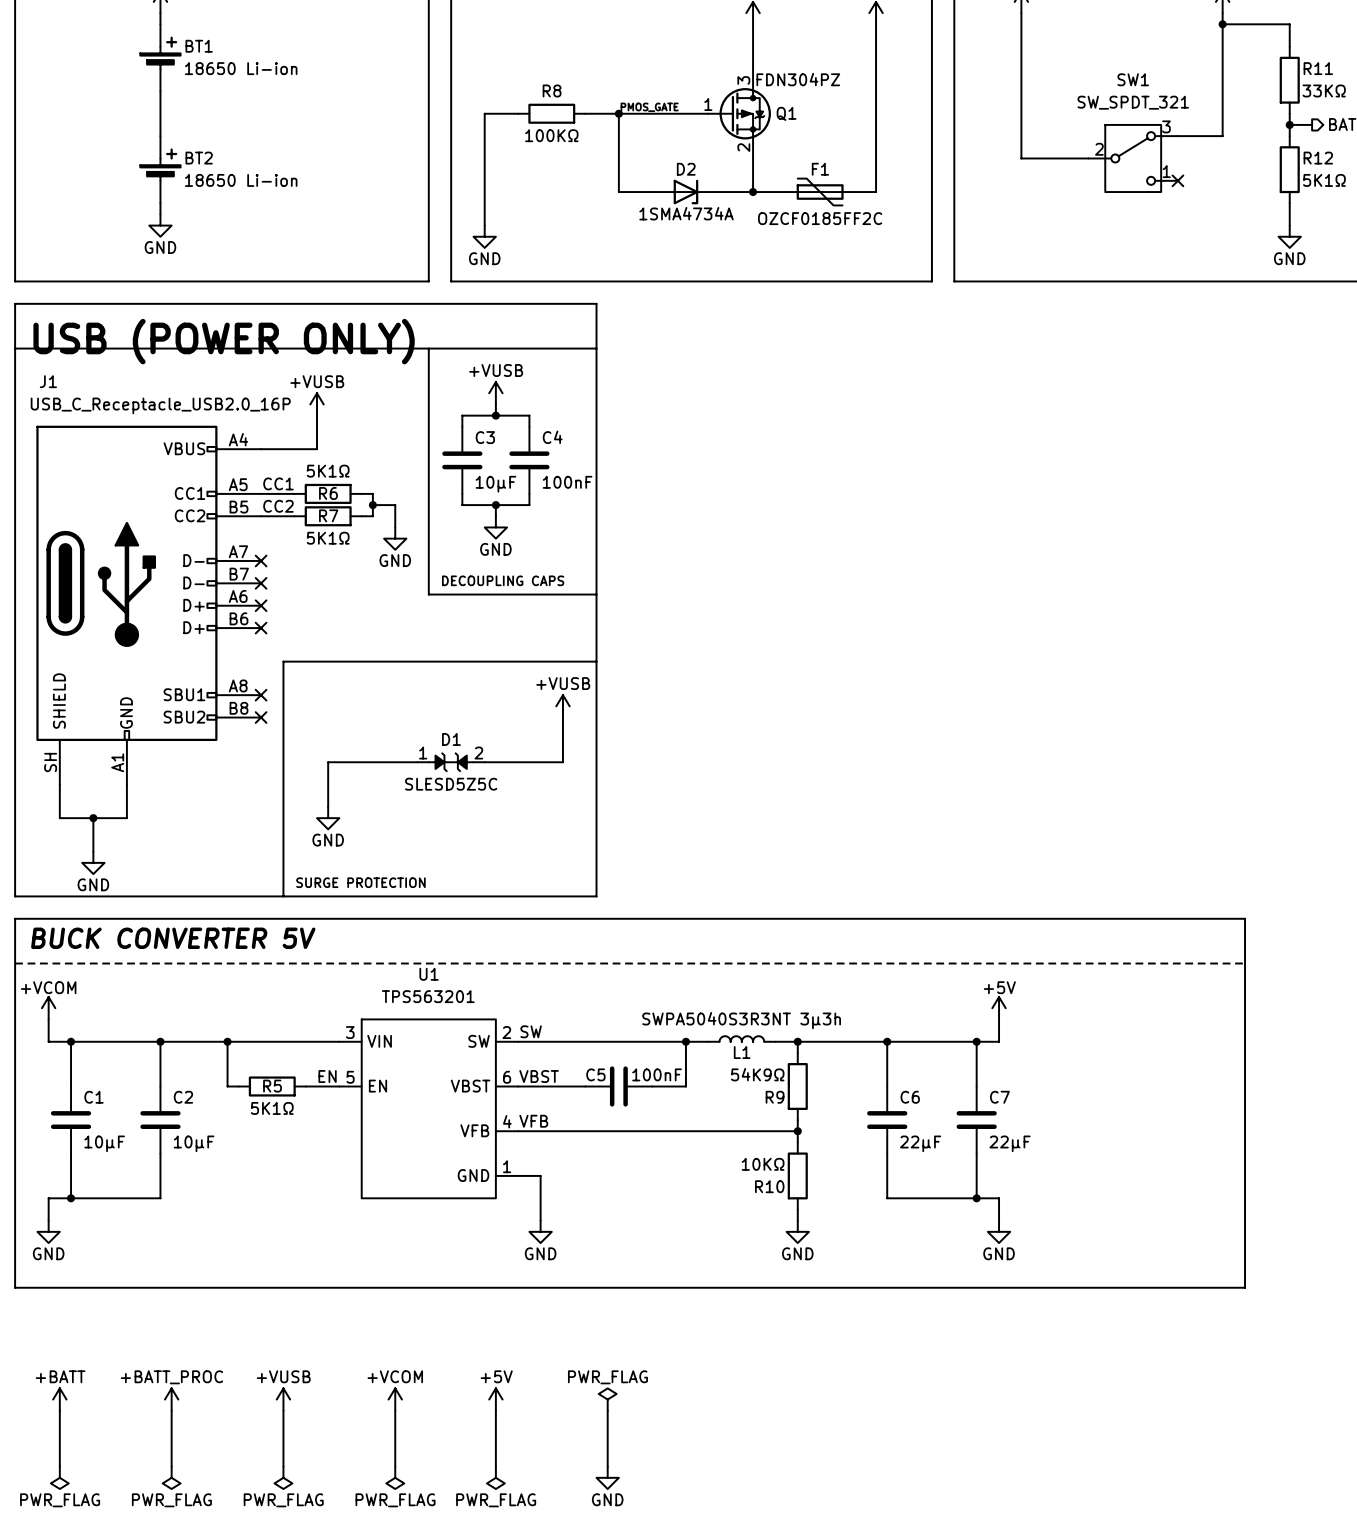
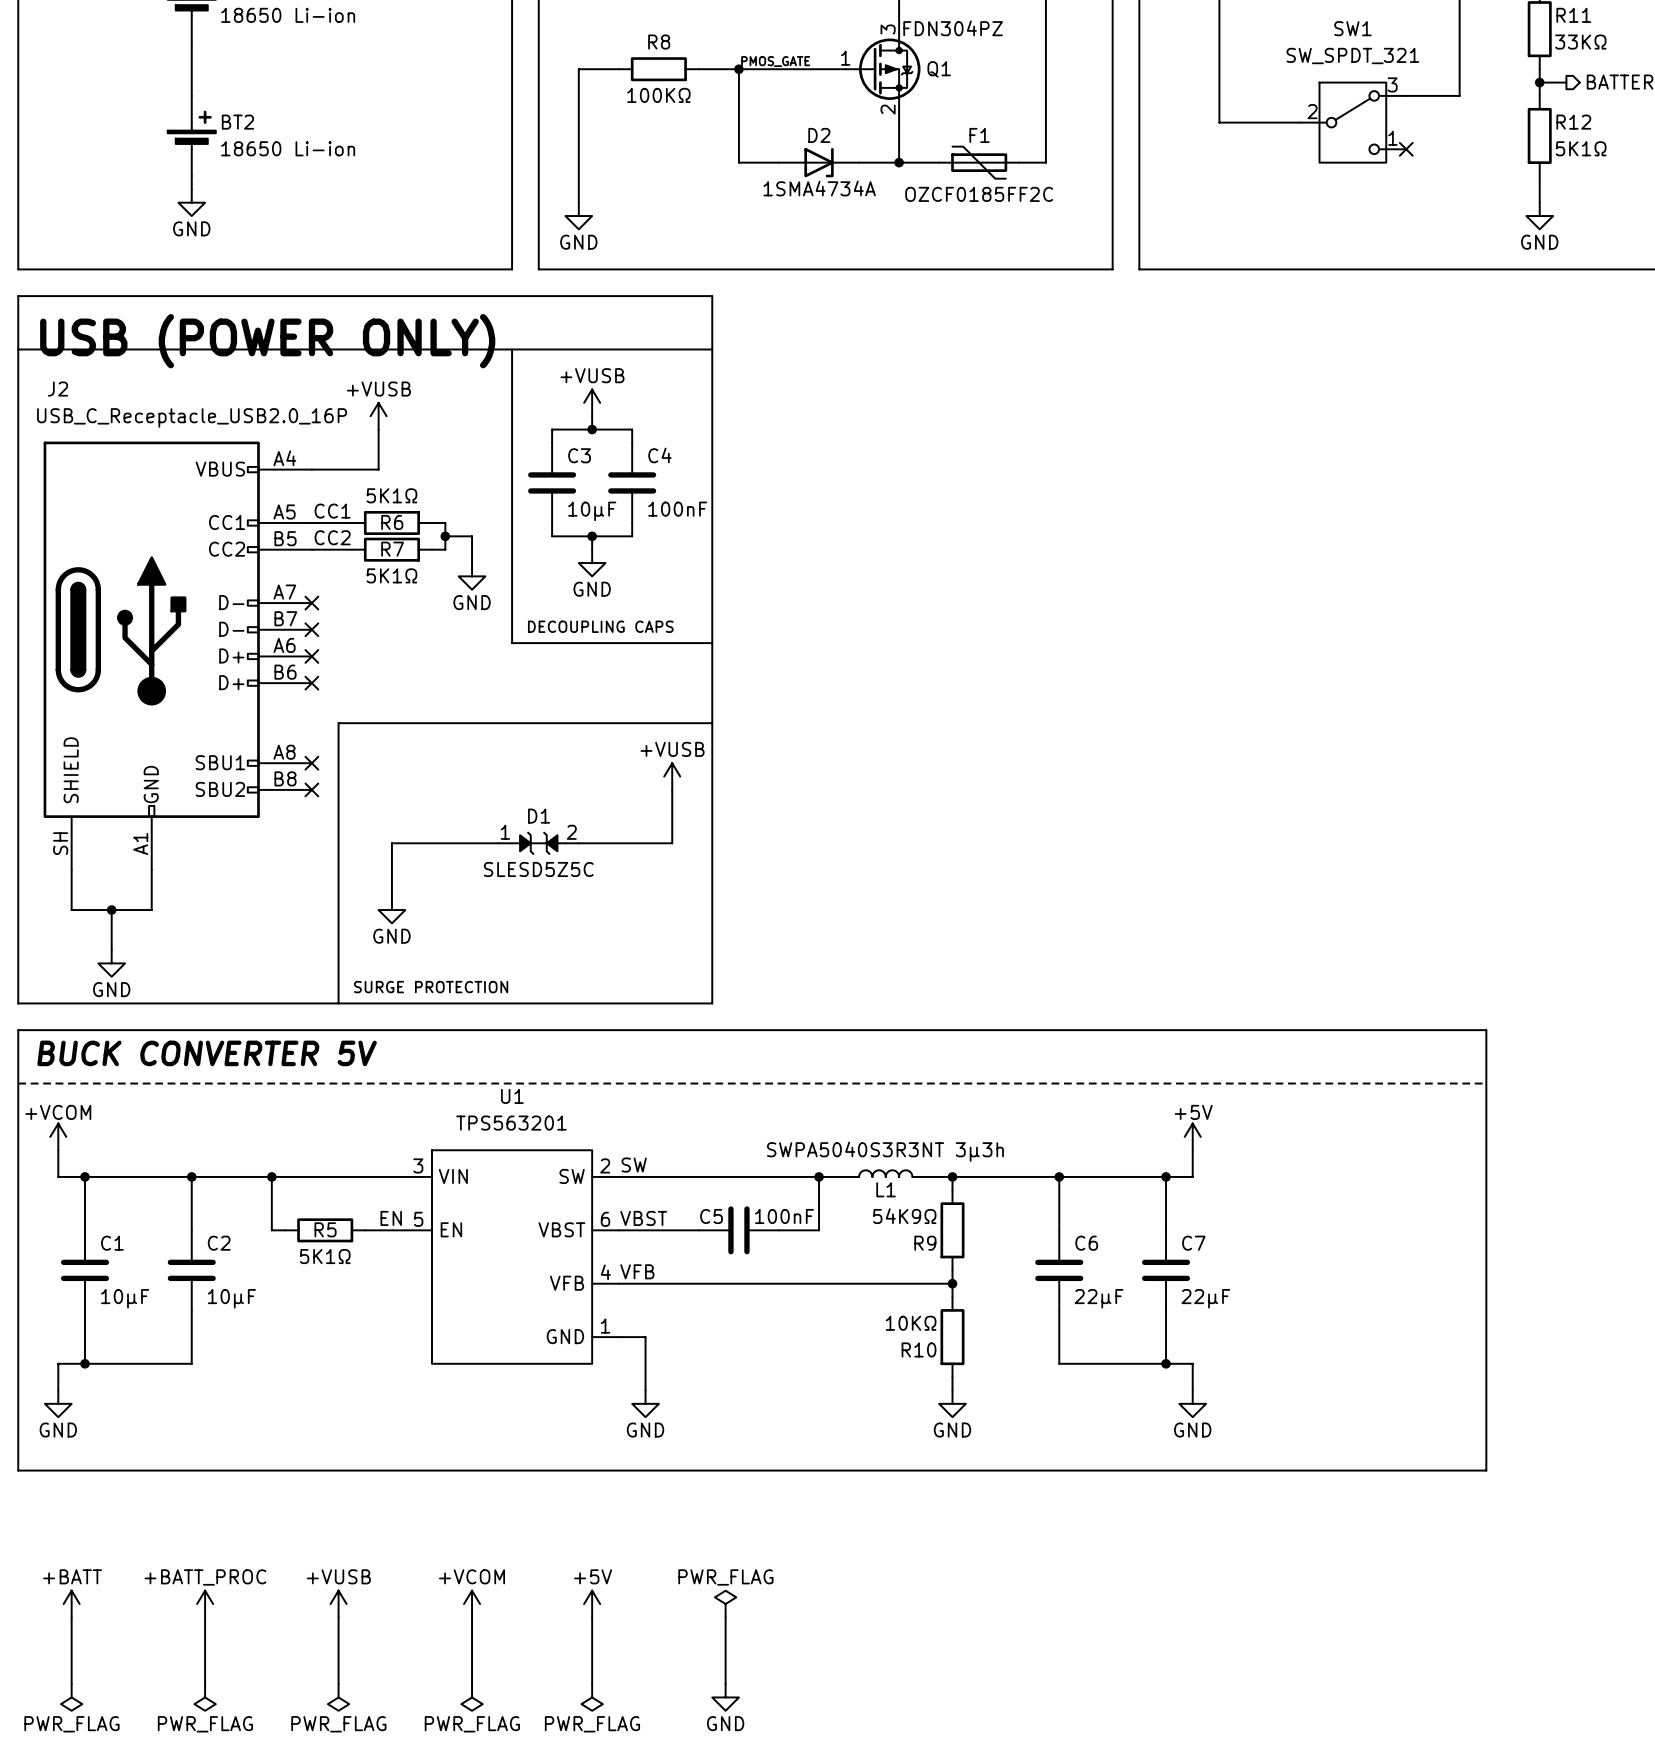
J1 name: J1 (48, 381) -> J2 (57, 389)

